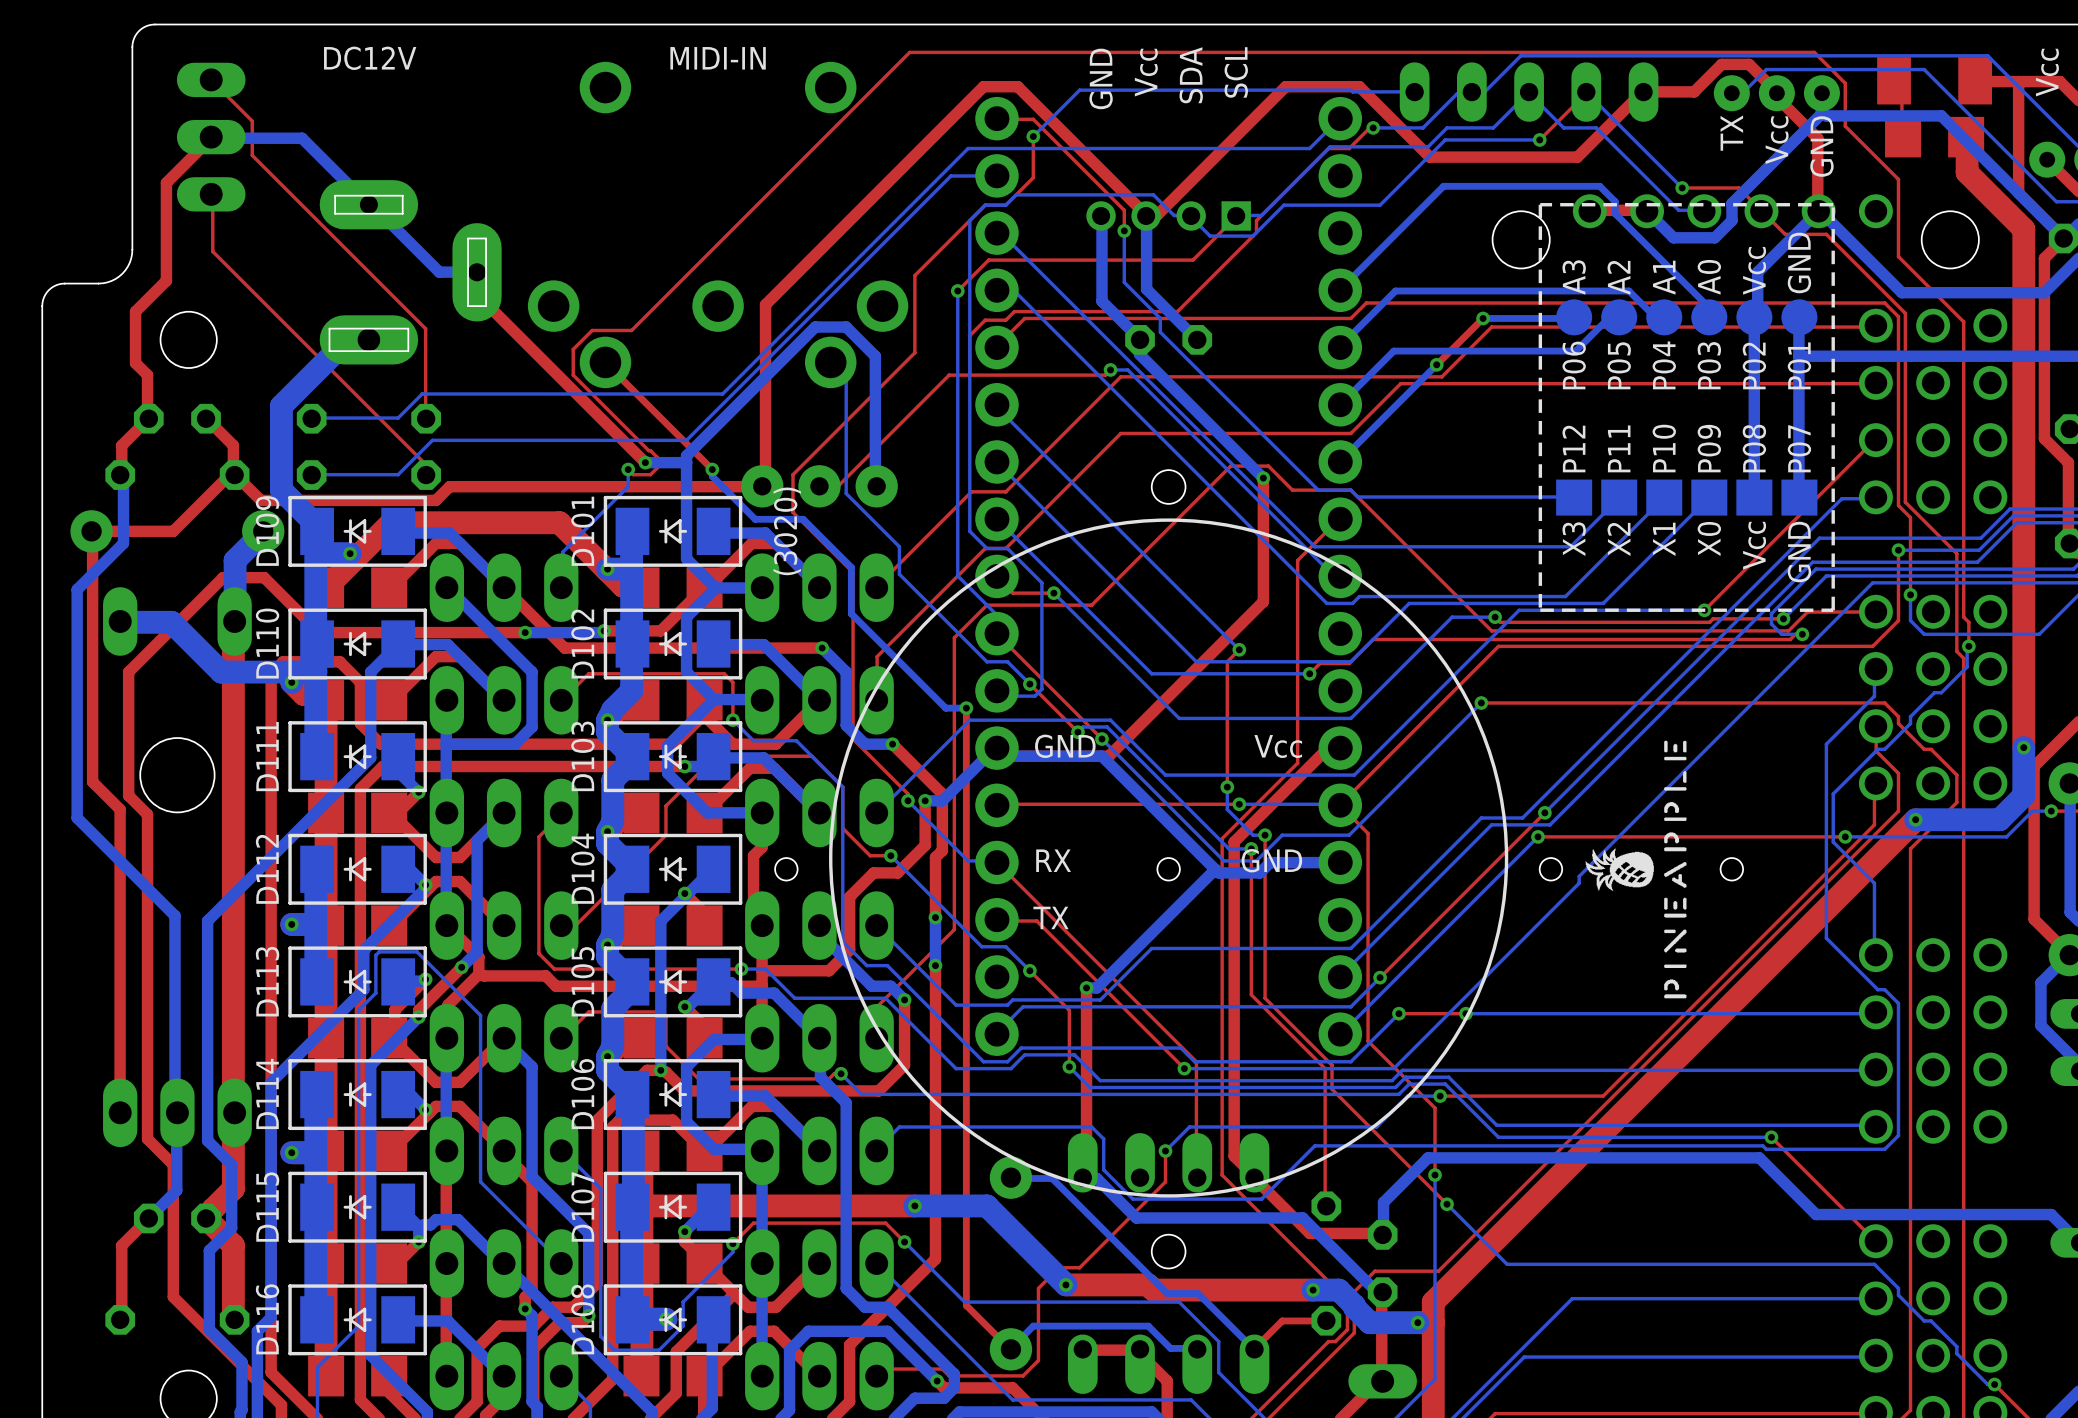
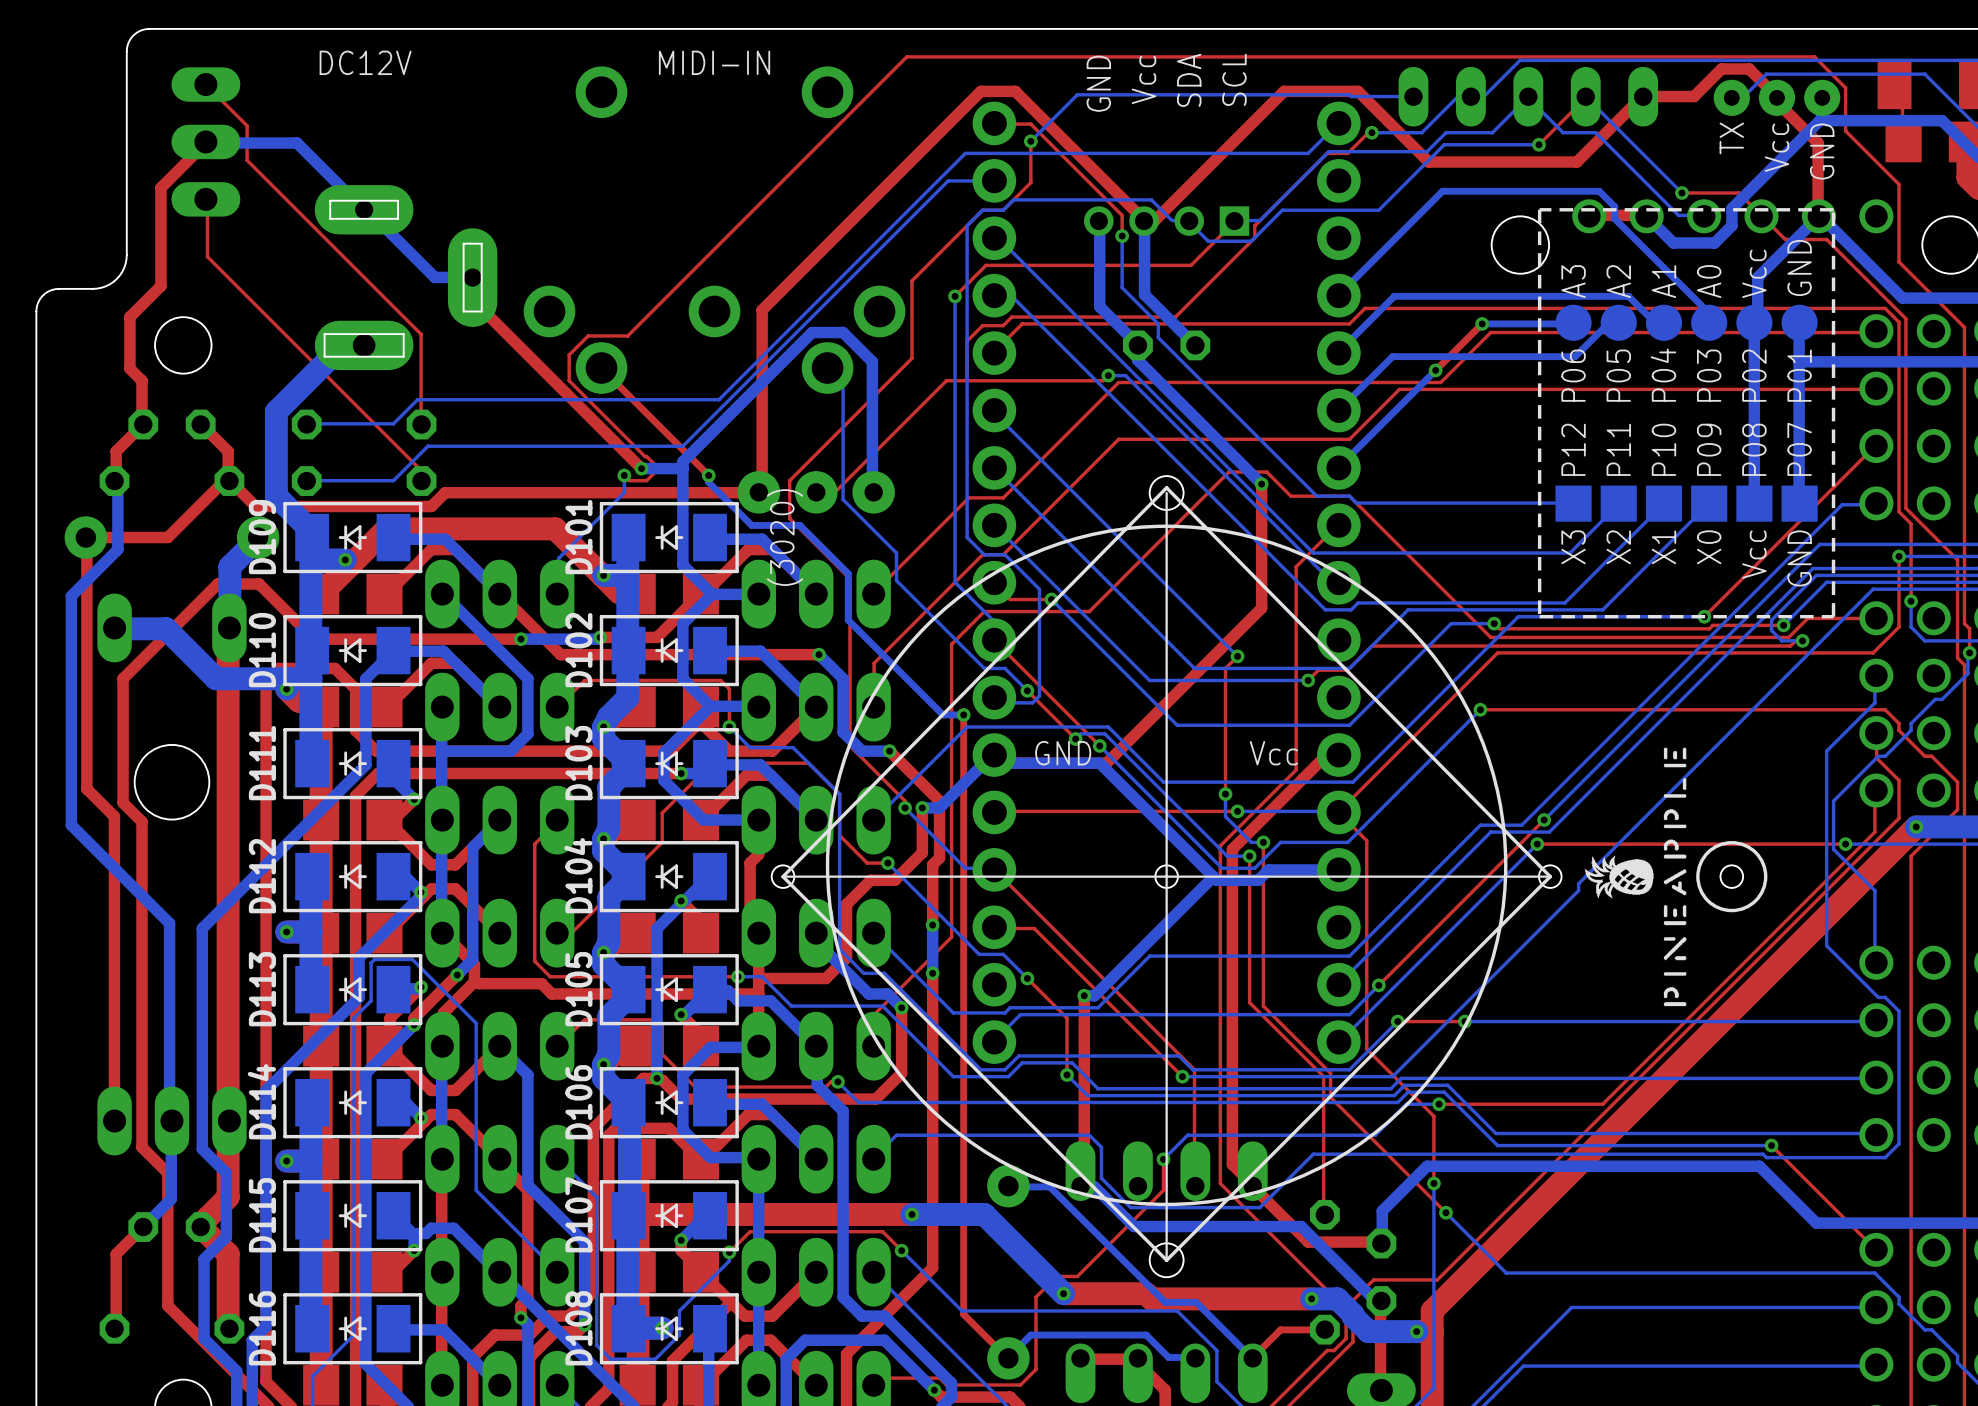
line: none -> (1166, 493) (1166, 1260)
drawing: none -> [1696, 841, 1768, 913]
text: RX (1053, 860) -> none
text: GND (1271, 860) -> none
line: none -> (783, 876) (1166, 1260)
line: none -> (1550, 876) (783, 876)
line: none -> (1550, 876) (1166, 487) (783, 876)
line: none -> (1550, 876) (1166, 1260)
text: TX (1051, 917) -> none

